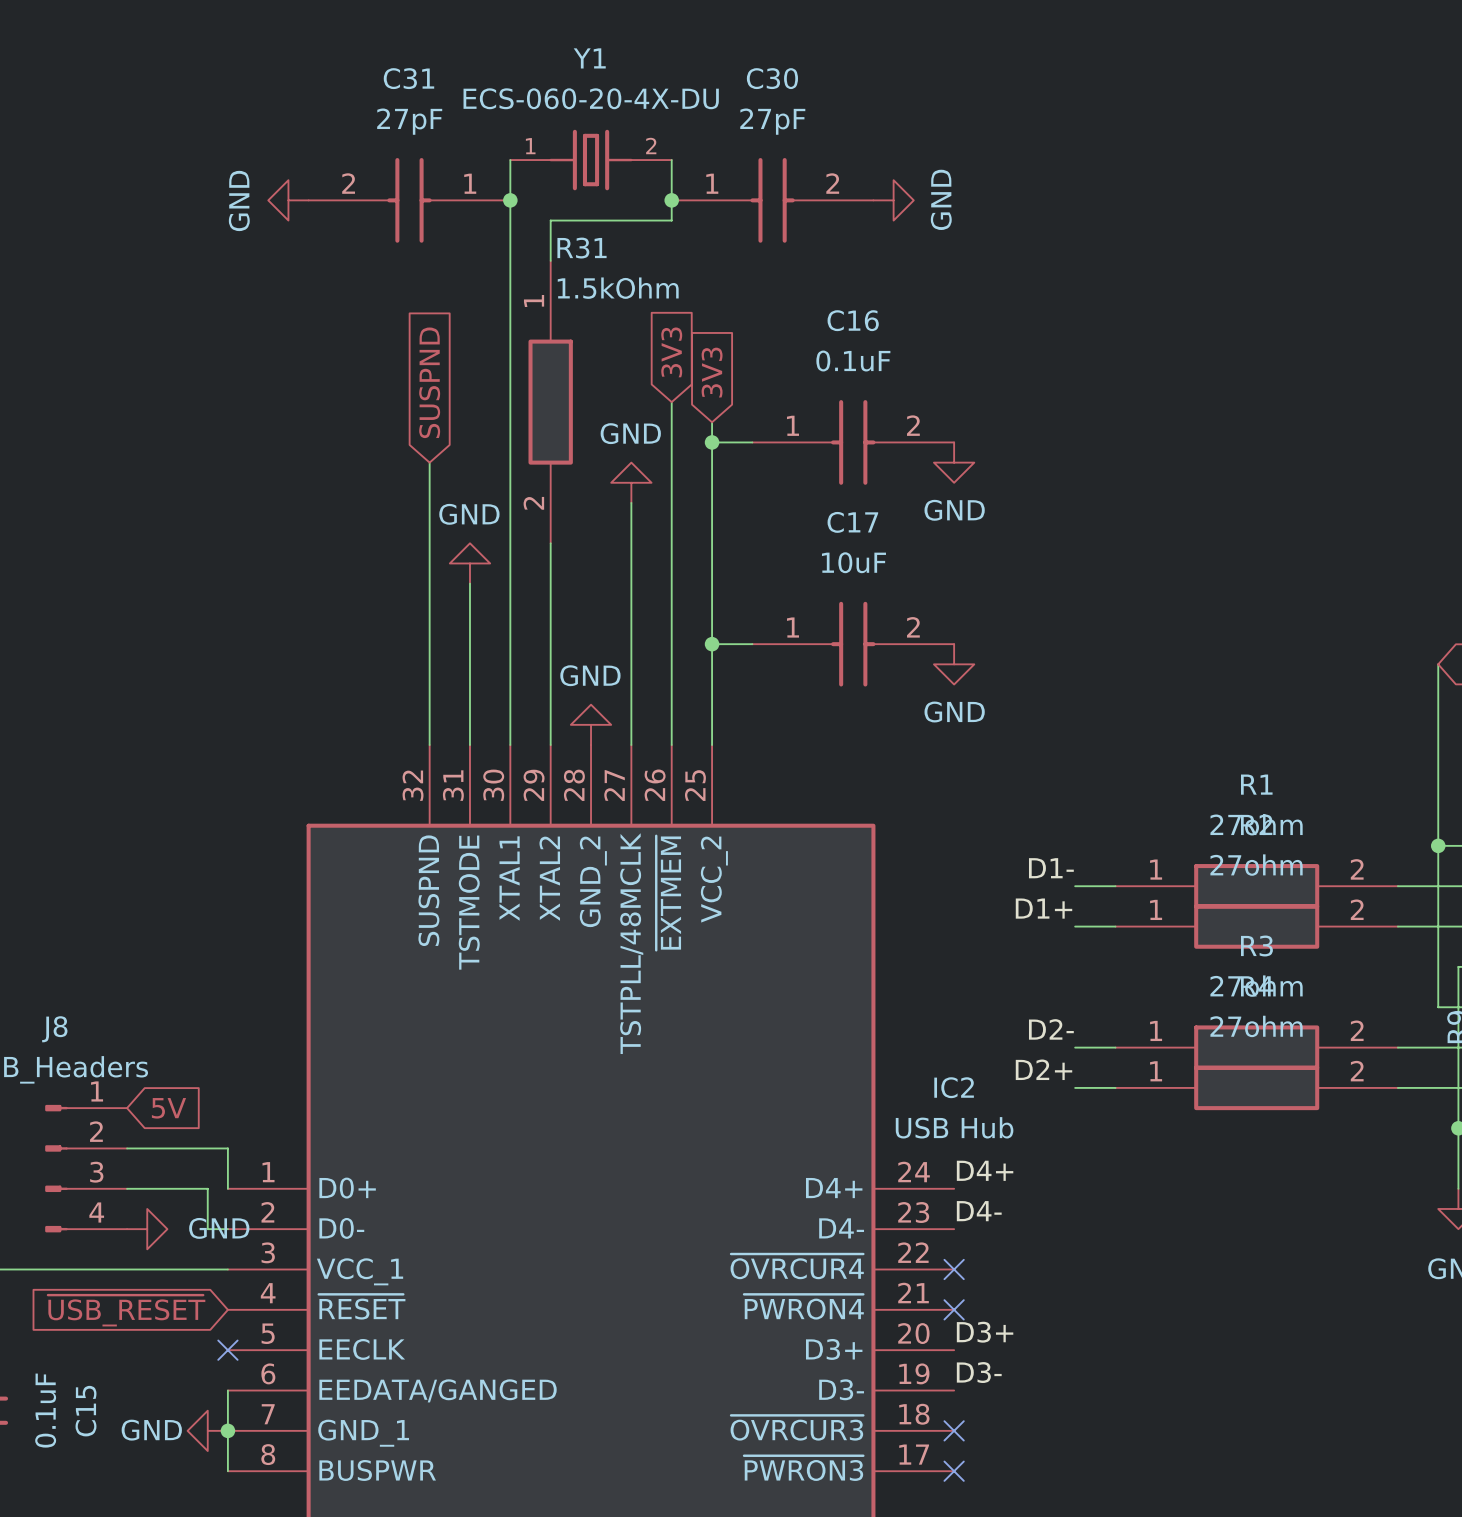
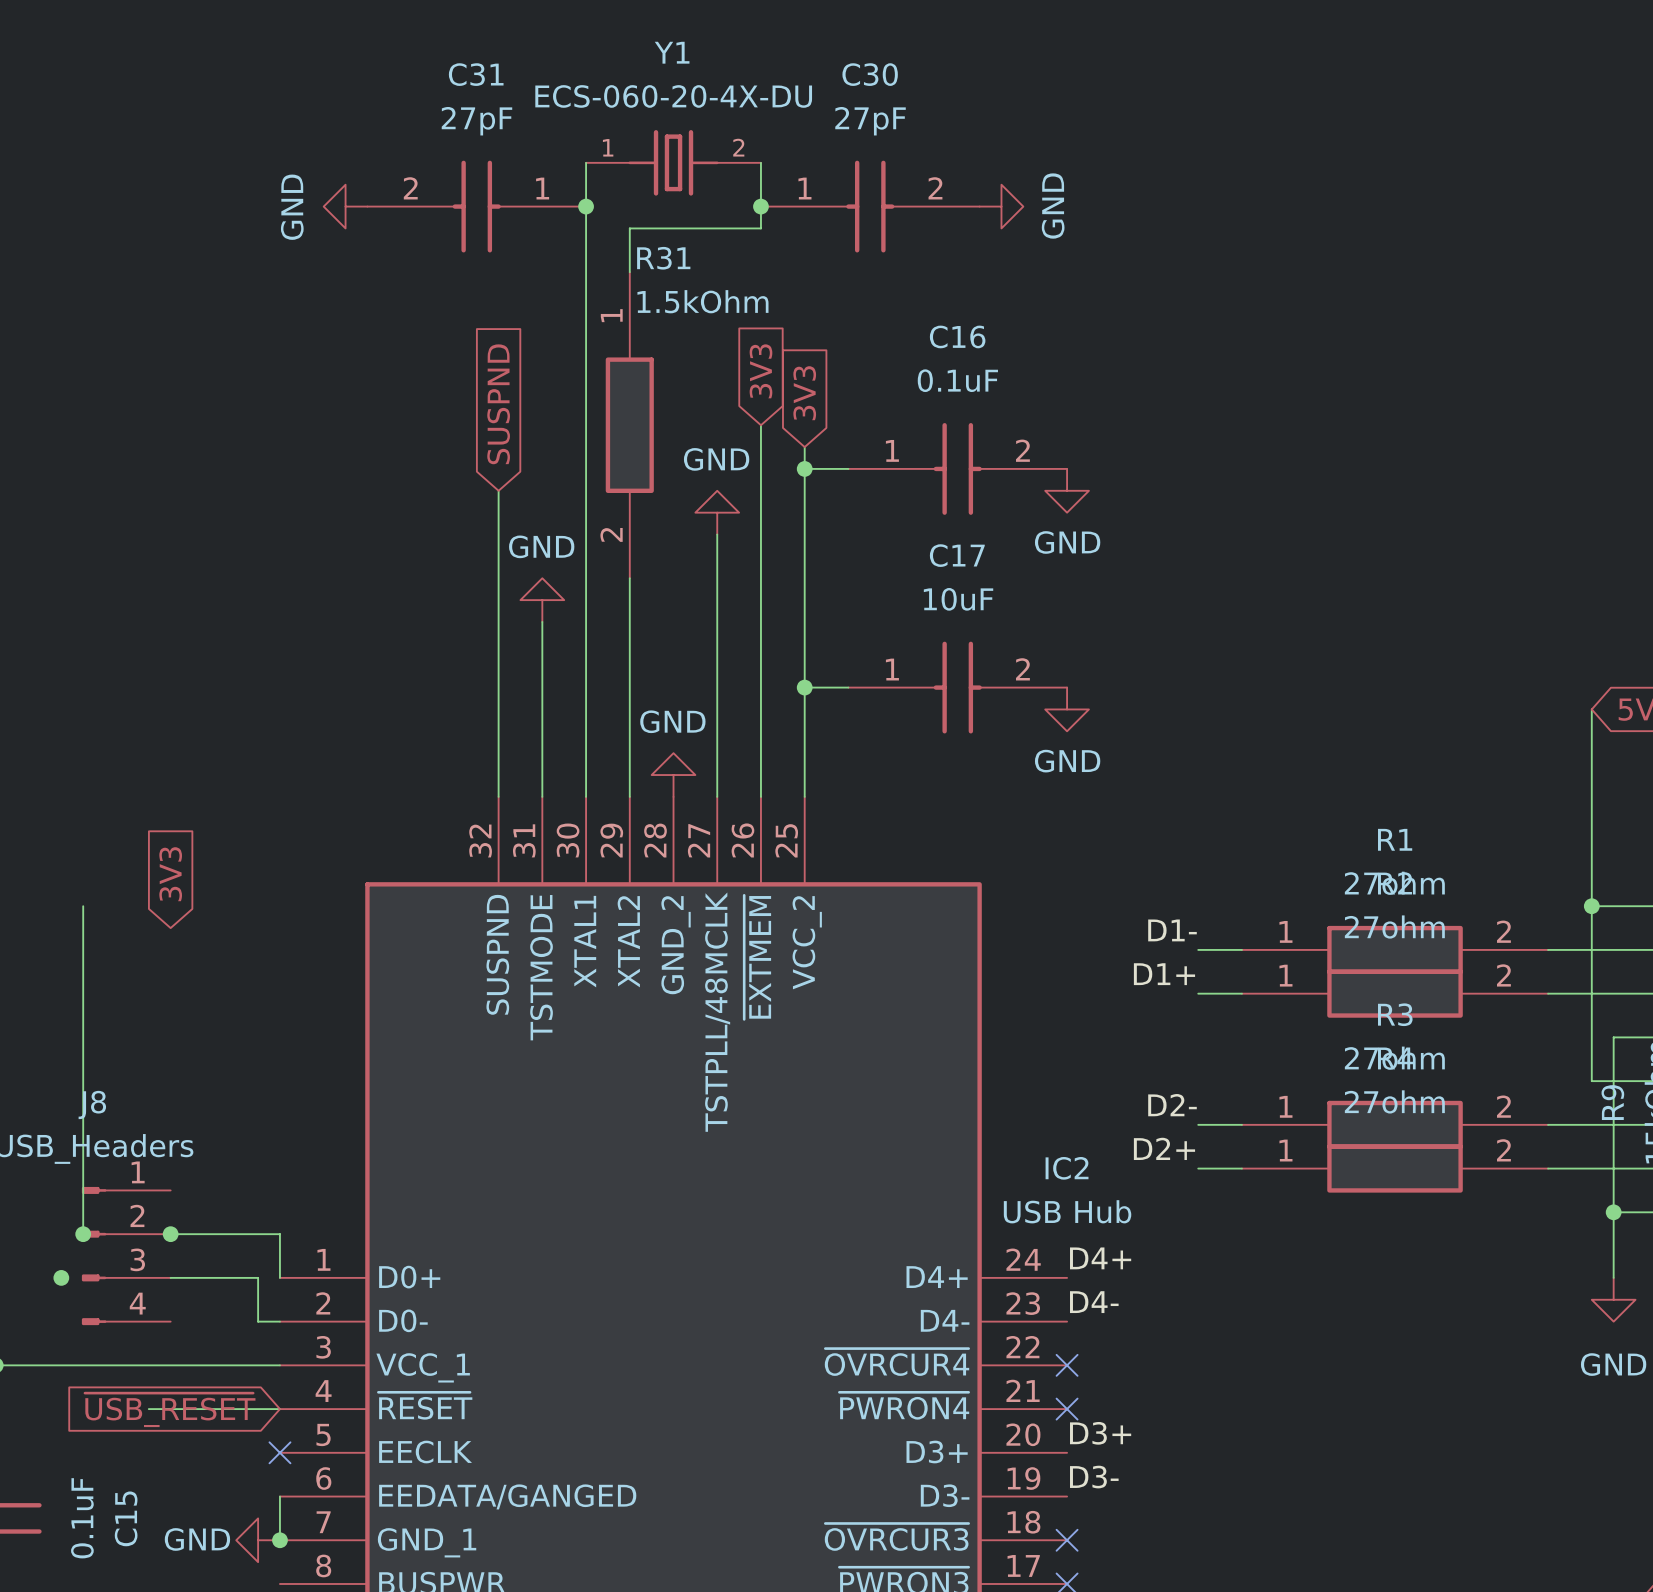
global label: none -> 3V3 (170, 874)
wire: none -> (83, 906) (83, 1234)
global label: 5V (168, 1108) -> none
junction: none -> (83, 1234)
junction: none -> (170, 1234)
junction: none -> (61, 1277)
power symbol: GND (147, 1229) -> none
wire: none -> (148, 1409) (279, 1409)
wire: (227, 1430) (227, 1471) -> none

